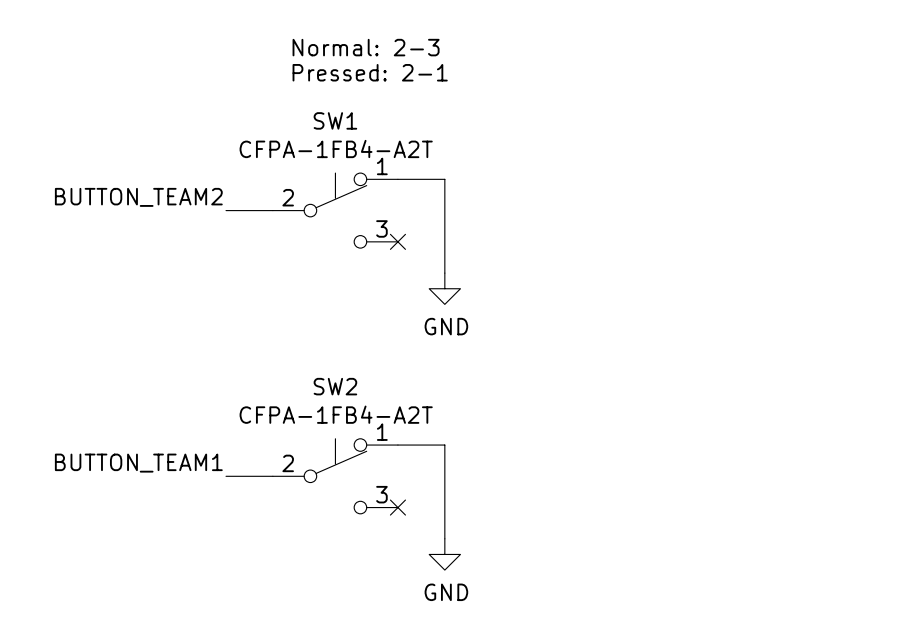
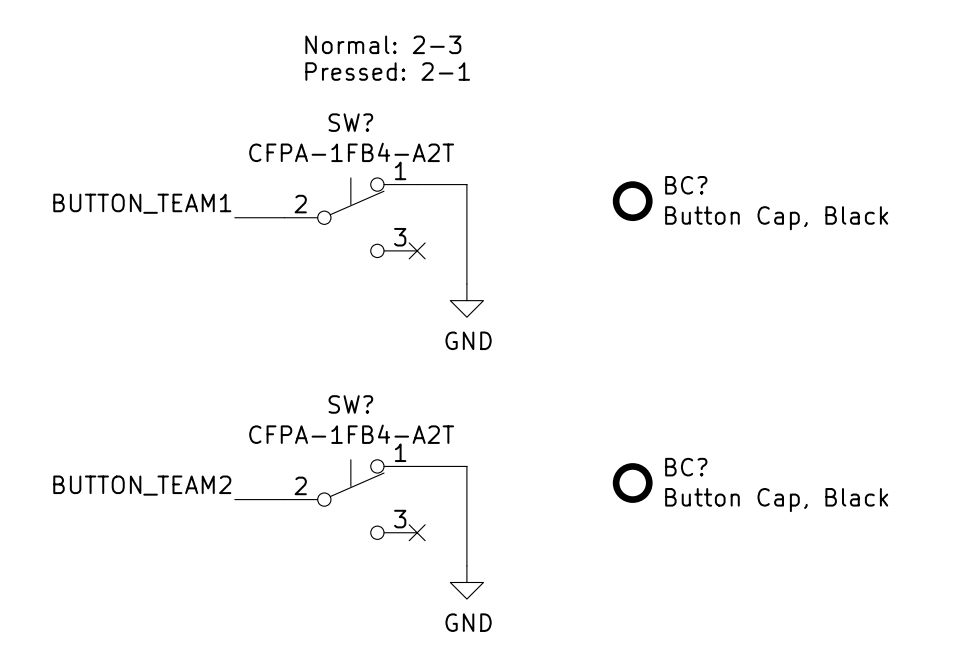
SW1 name: SW1 (335, 120) -> SW? (350, 122)
BC?: none -> Button Cap, Black (632, 201)
label: BUTTON_TEAM2 (138, 197) -> BUTTON_TEAM1 (142, 203)
SW2 name: SW2 (335, 386) -> SW? (350, 404)
BC?: none -> Button Cap, Black (632, 483)
label: BUTTON_TEAM1 (138, 463) -> BUTTON_TEAM2 (142, 485)

